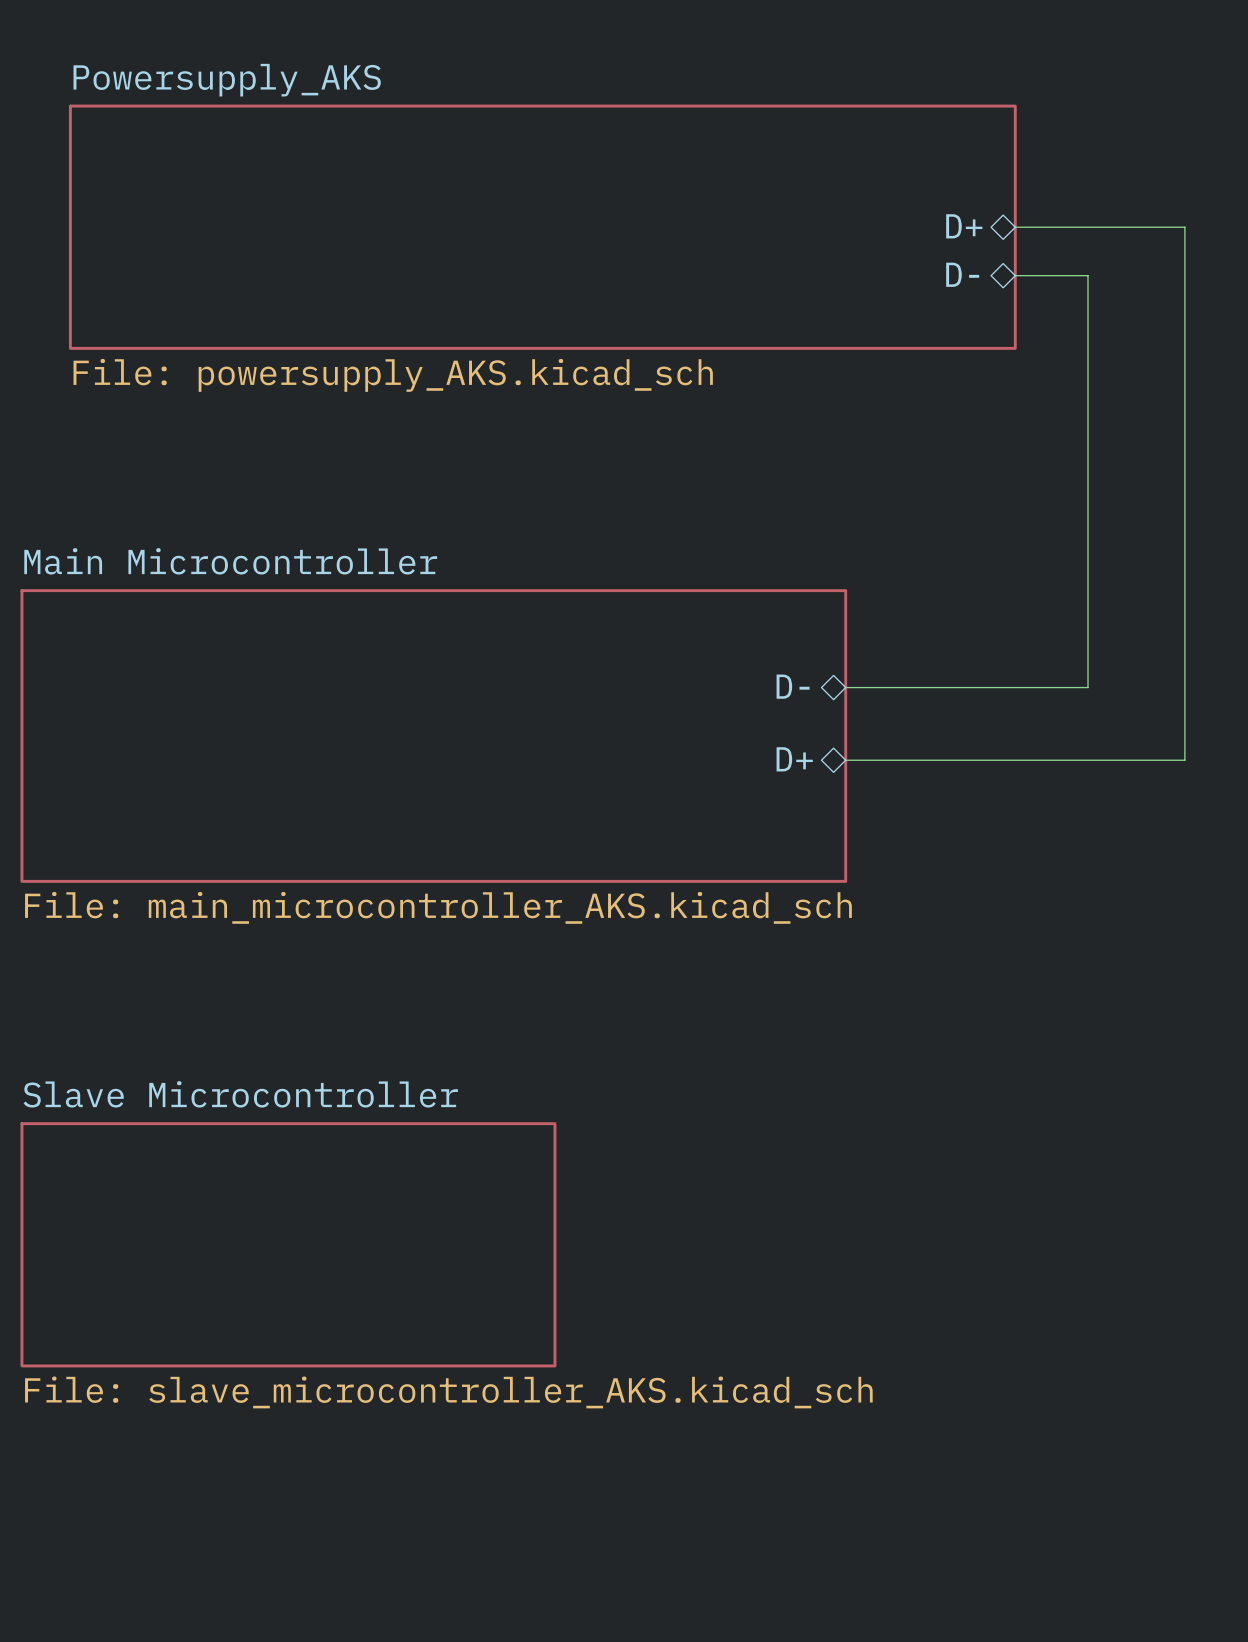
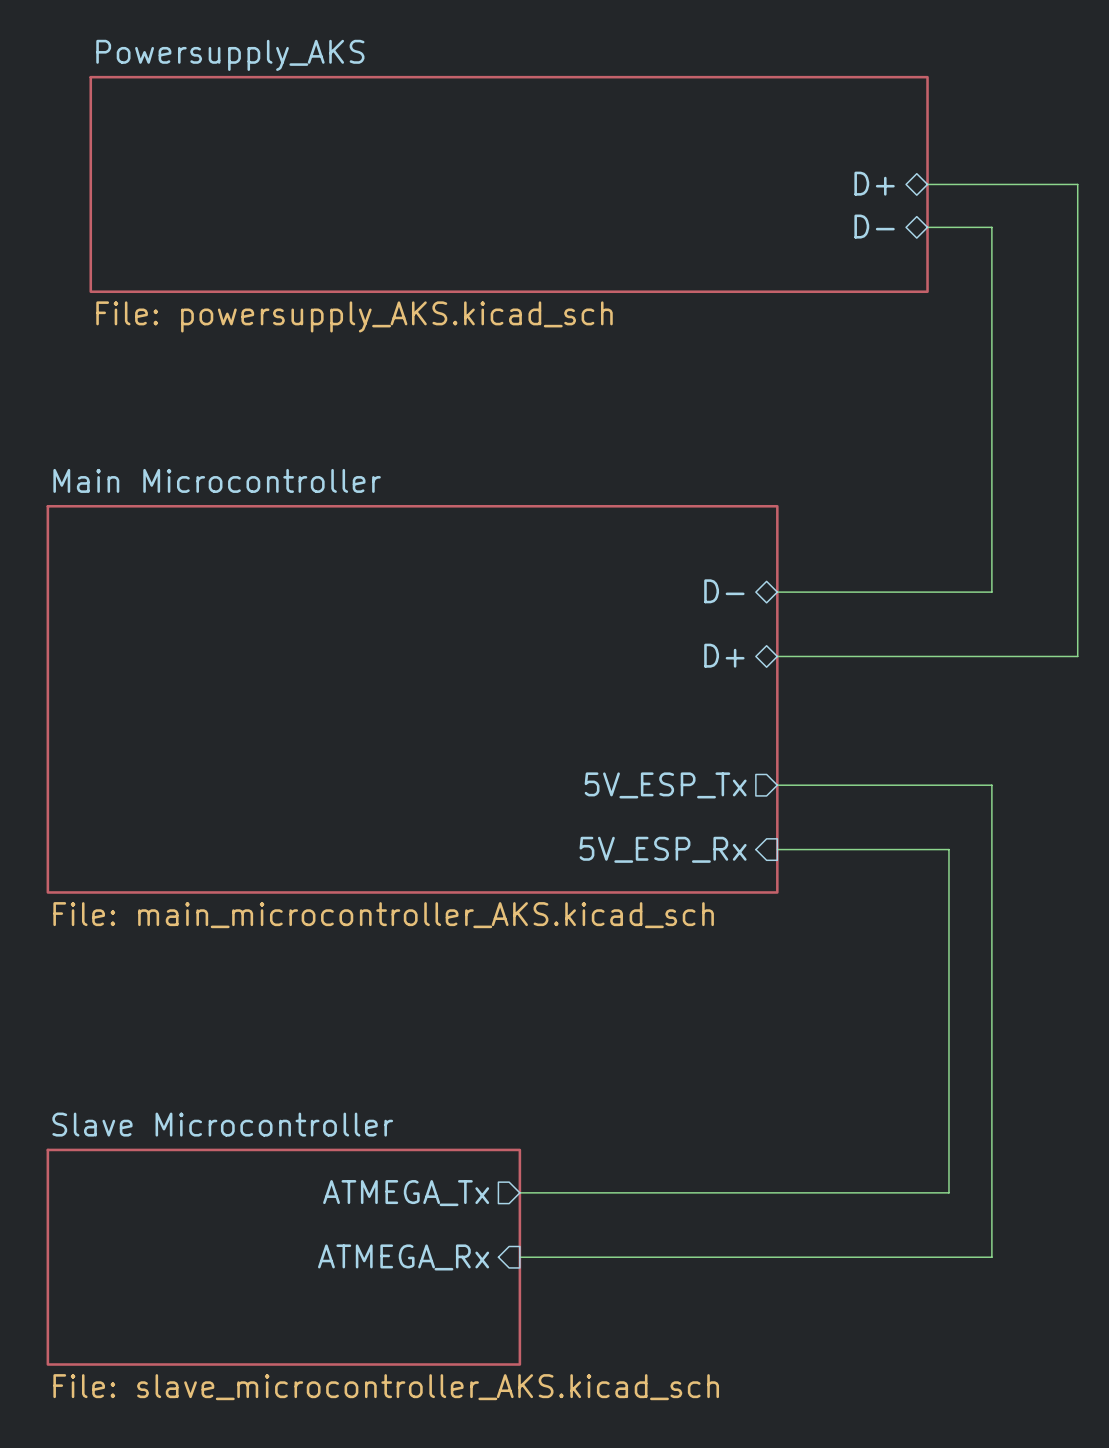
sheet Main Microcontroller: File: main_microcontroller_AKS.kicad_sch (433, 736) -> none
sheet Main Microcontroller: none -> File: main_microcontroller_AKS.kicad_sch (412, 699)
wire: none -> (777, 785) (991, 785) (991, 1257) (519, 1257)
sheet pin: none -> 5V_ESP_Tx (665, 785)
wire: none -> (777, 849) (948, 849) (948, 1192) (519, 1192)
sheet pin: none -> 5V_ESP_Rx (663, 849)
sheet Slave Microcontroller position: (288, 1244) -> (283, 1257)
sheet pin: none -> ATMEGA_Tx (406, 1193)
sheet pin: none -> ATMEGA_Rx (403, 1257)

